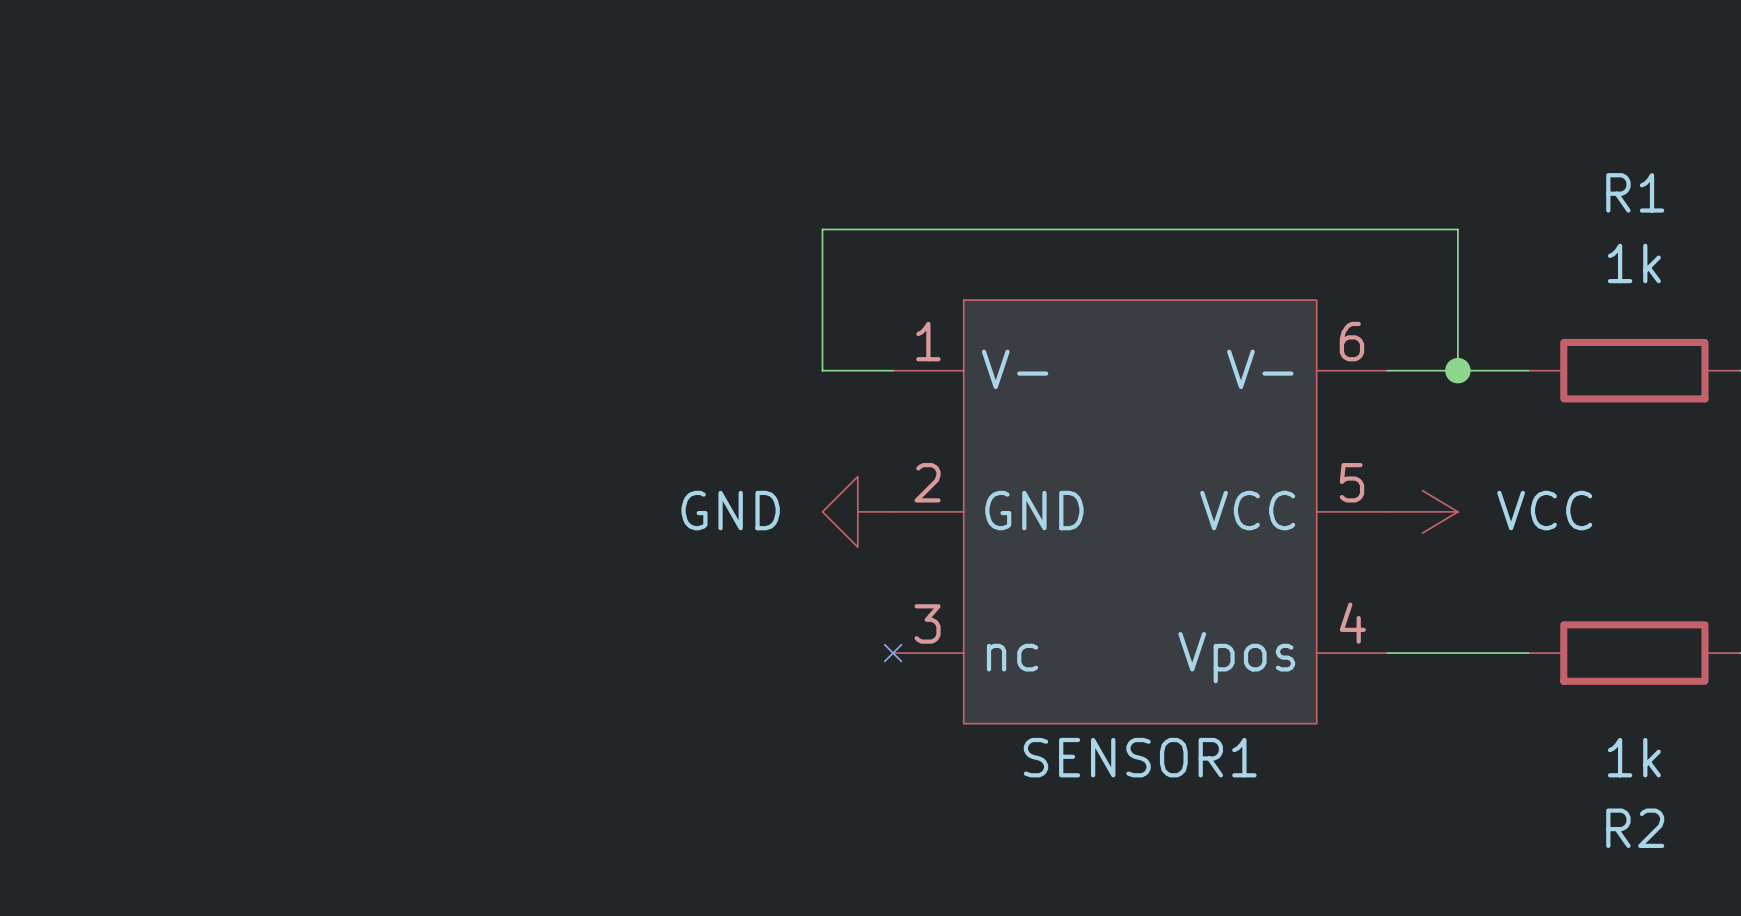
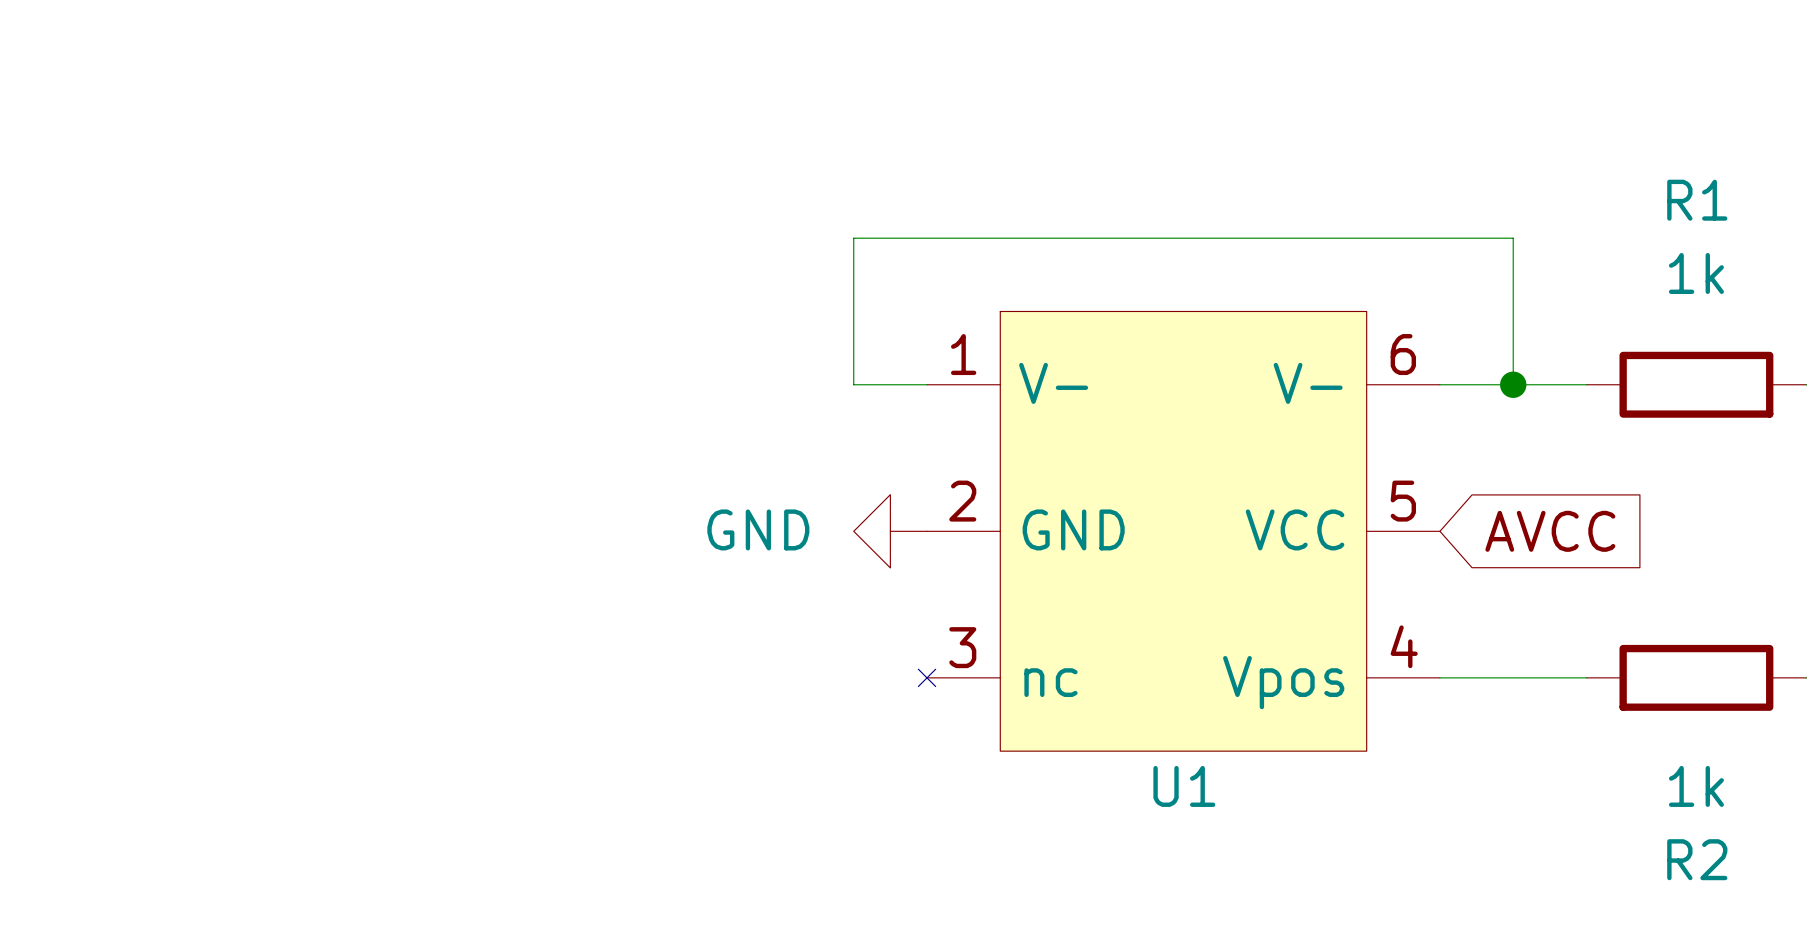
power symbol: VCC (1422, 511) -> none
global label: none -> AVCC (1550, 531)
SENSOR1 name: SENSOR1 (1140, 757) -> U1 (1184, 786)

